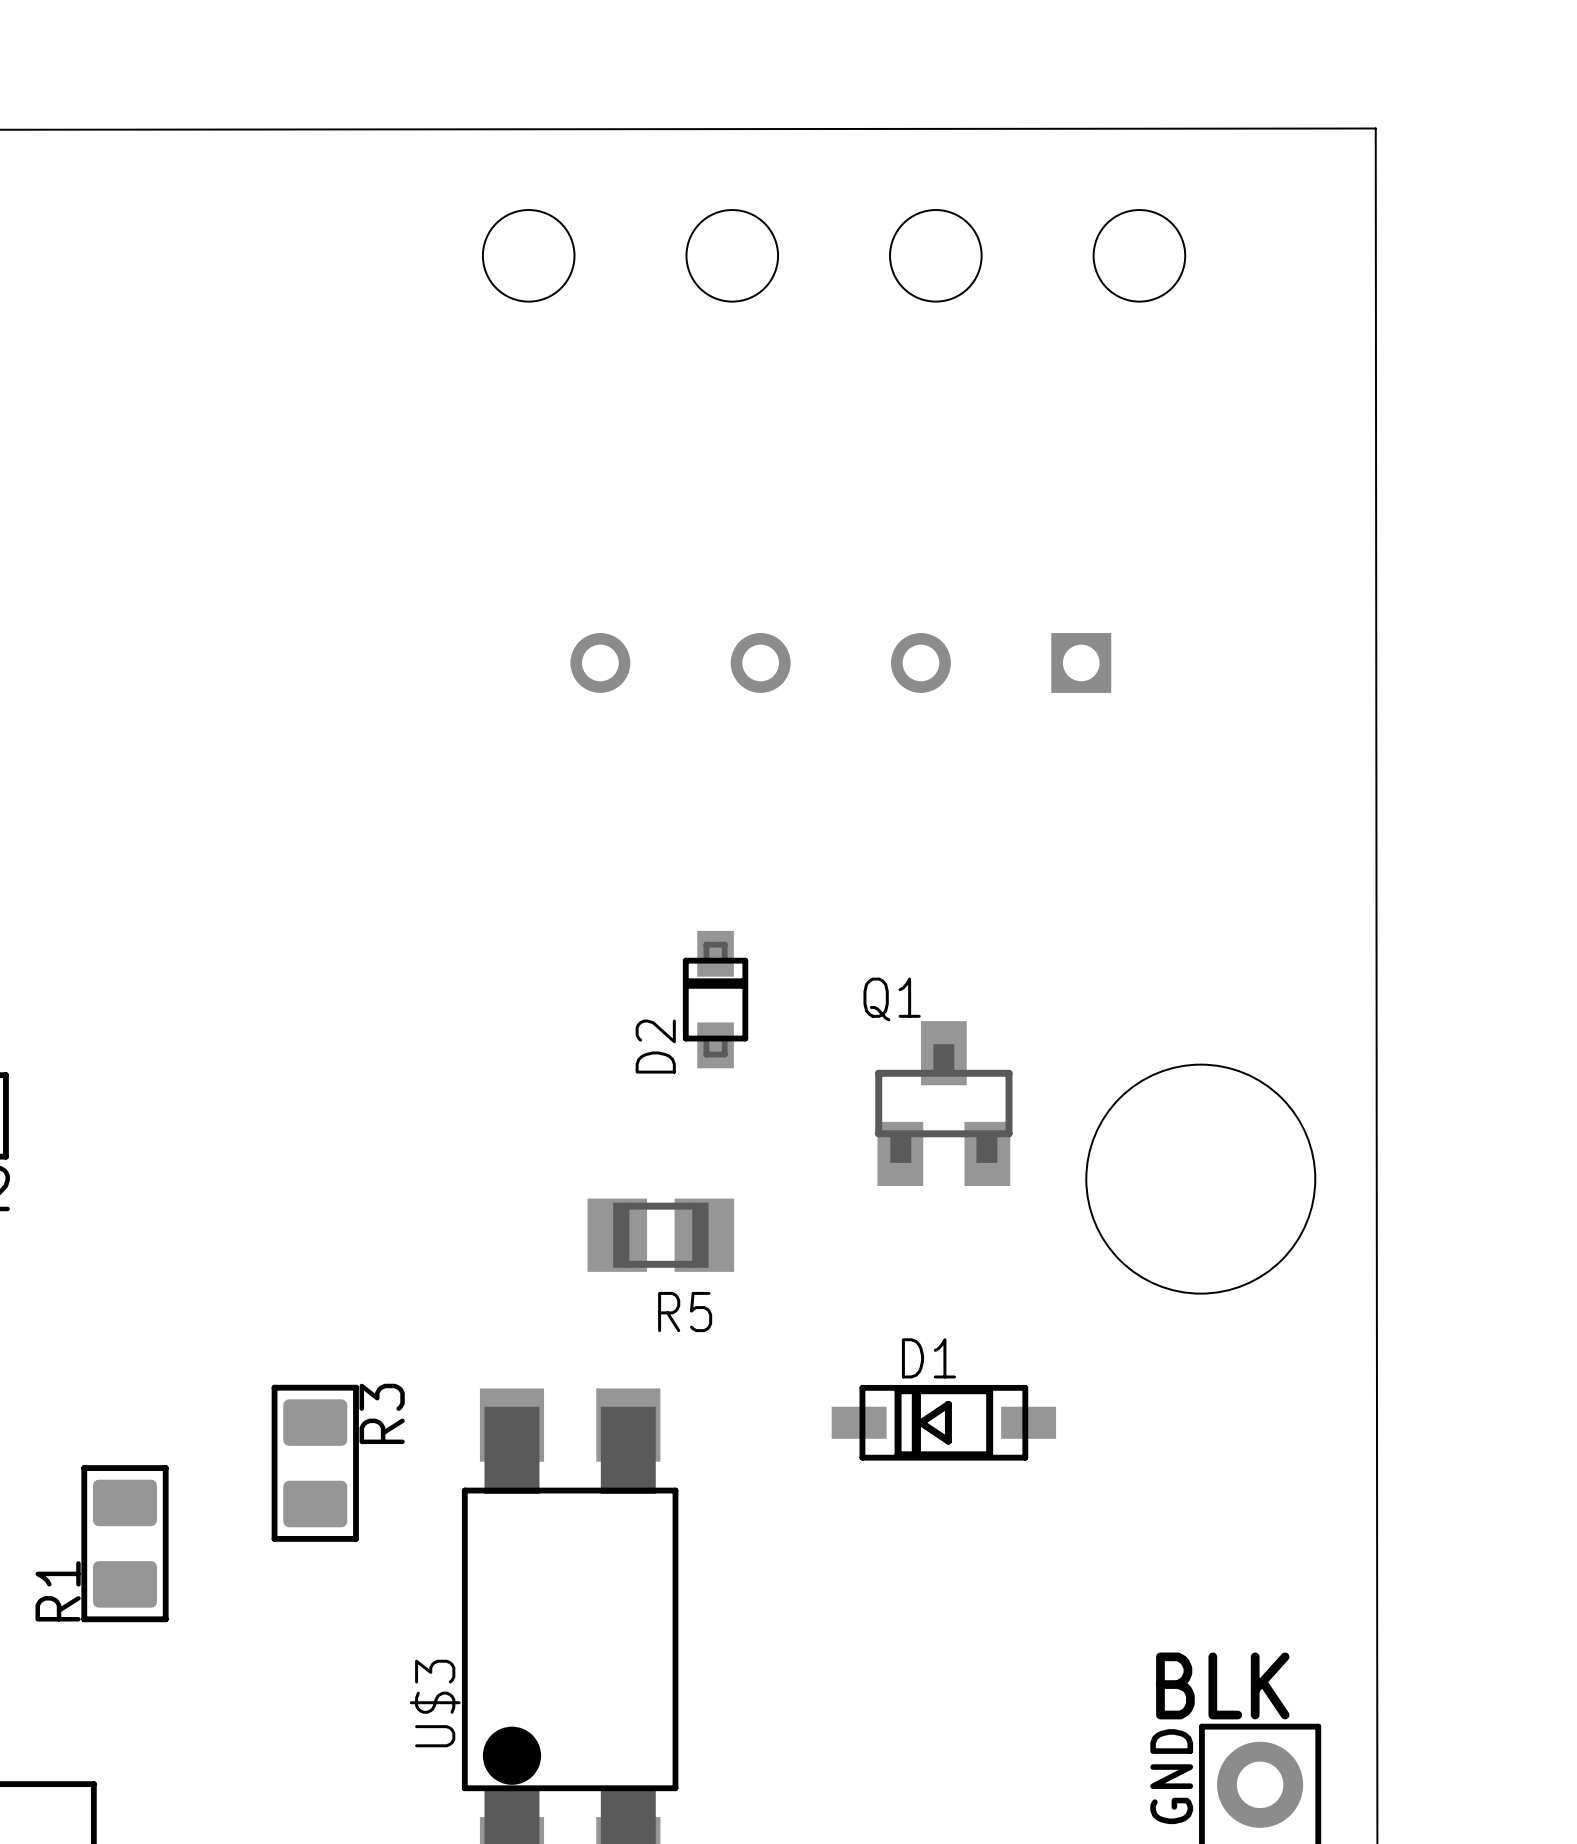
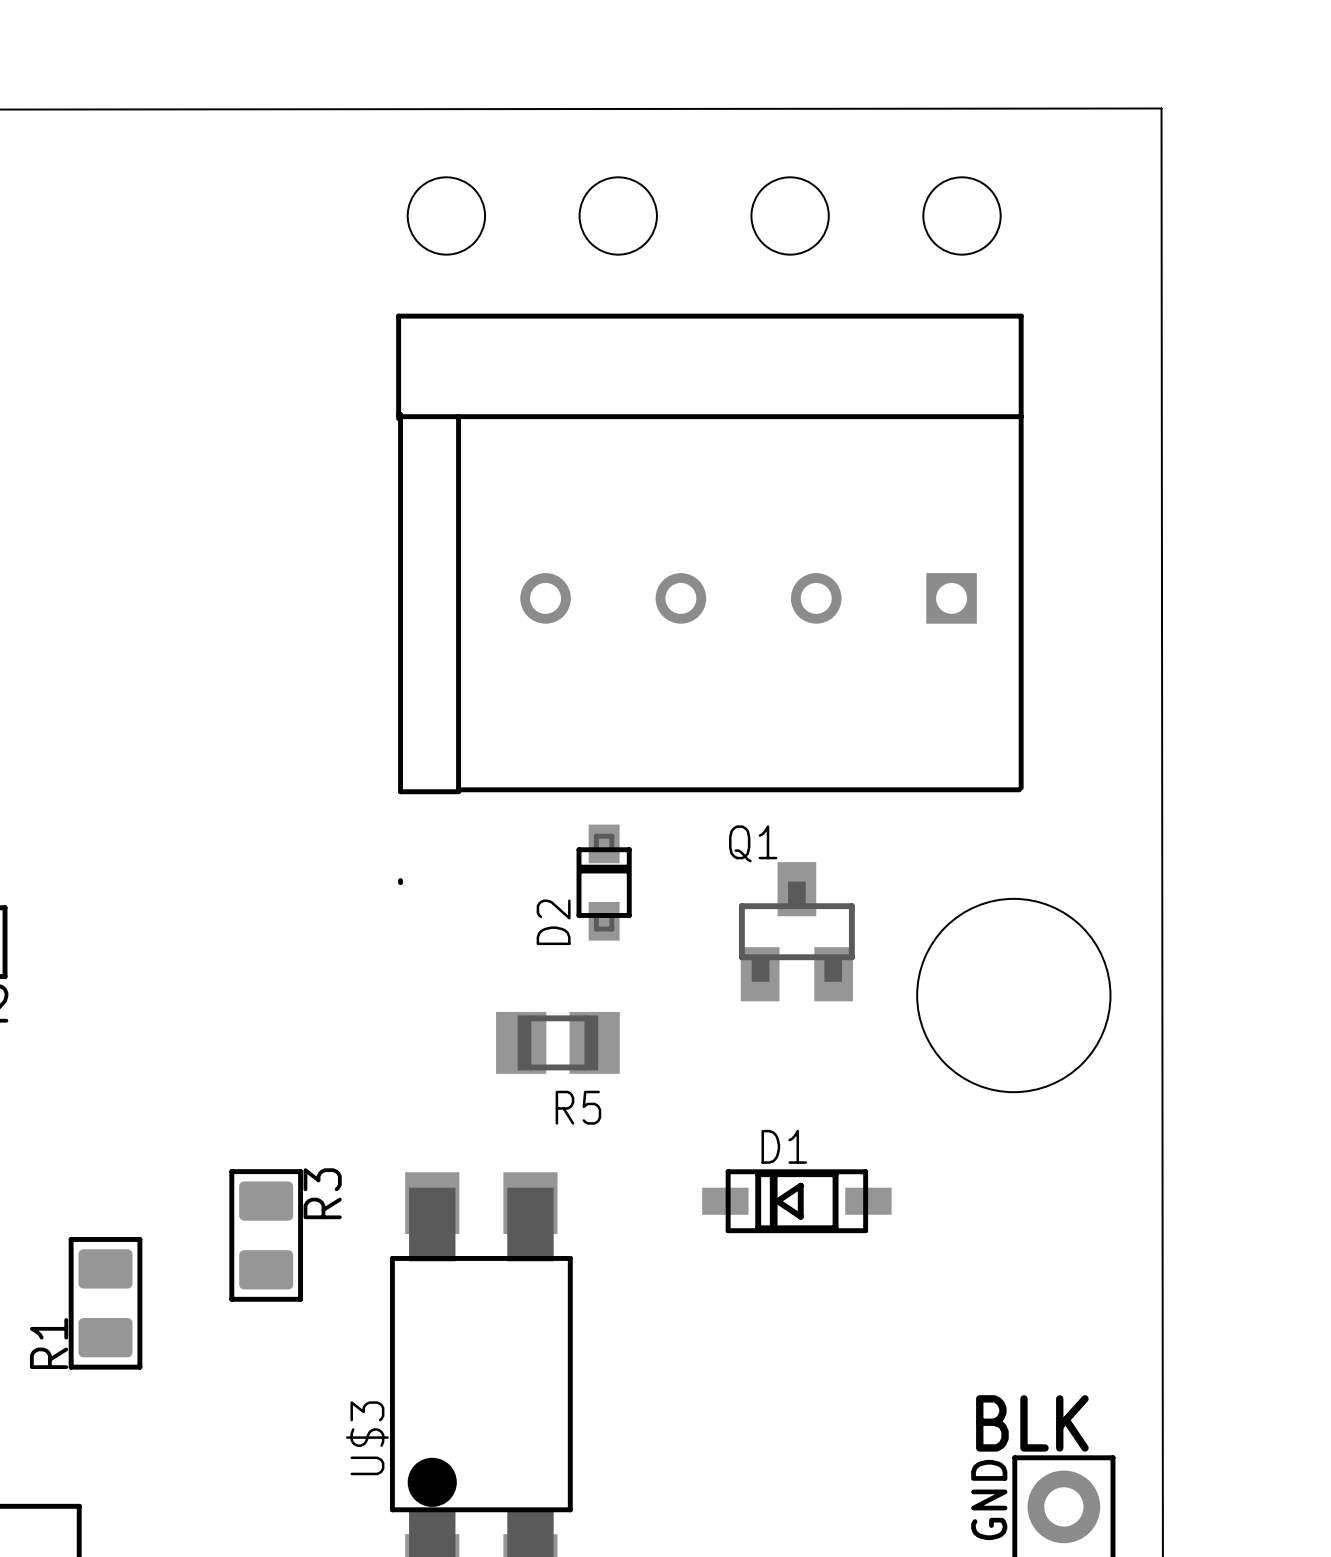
part: (840, 662) -> none
part: none -> (709, 599)
D2 position: (715, 999) -> (604, 882)

